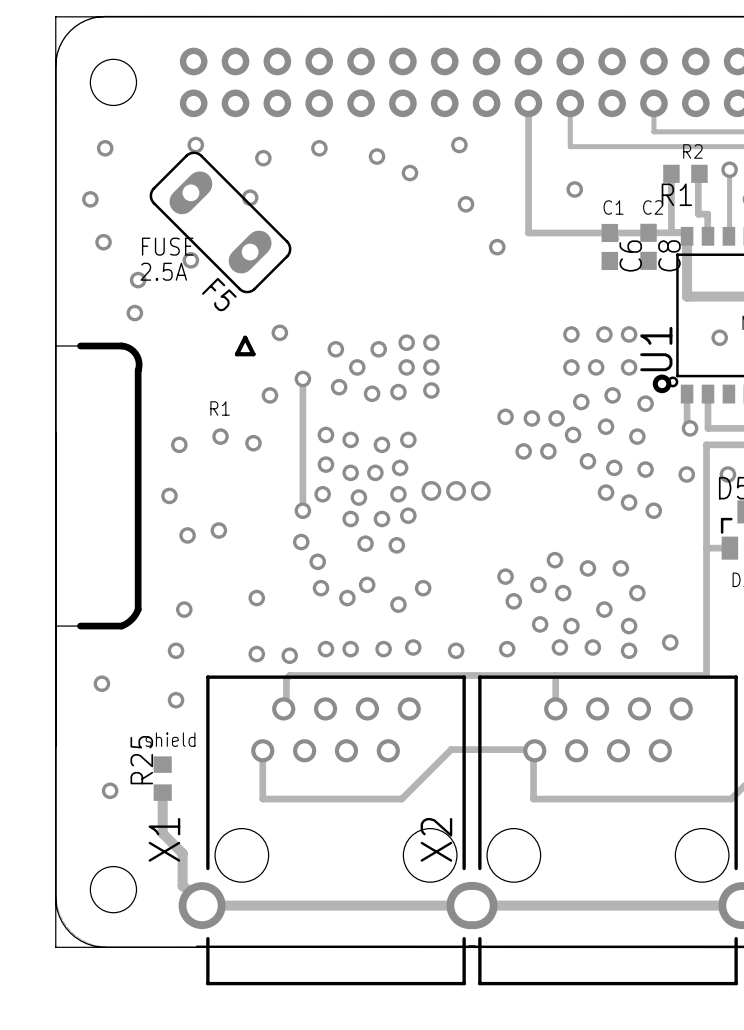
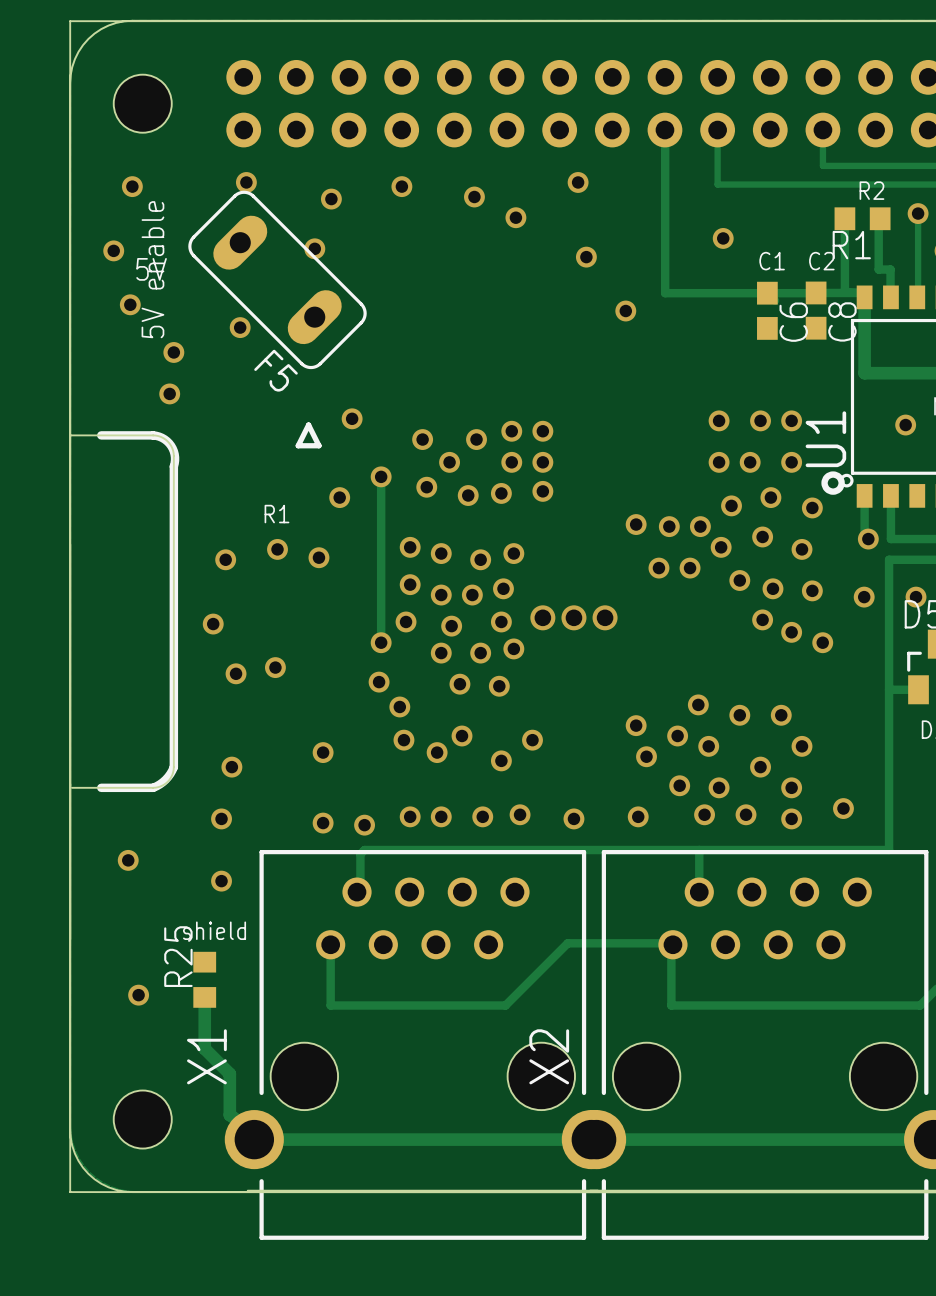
text: none -> 5V (151, 269)
text: none -> 5V enable (152, 269)
text: FUSE (167, 246) -> none
text: 2.5A (163, 271) -> none

